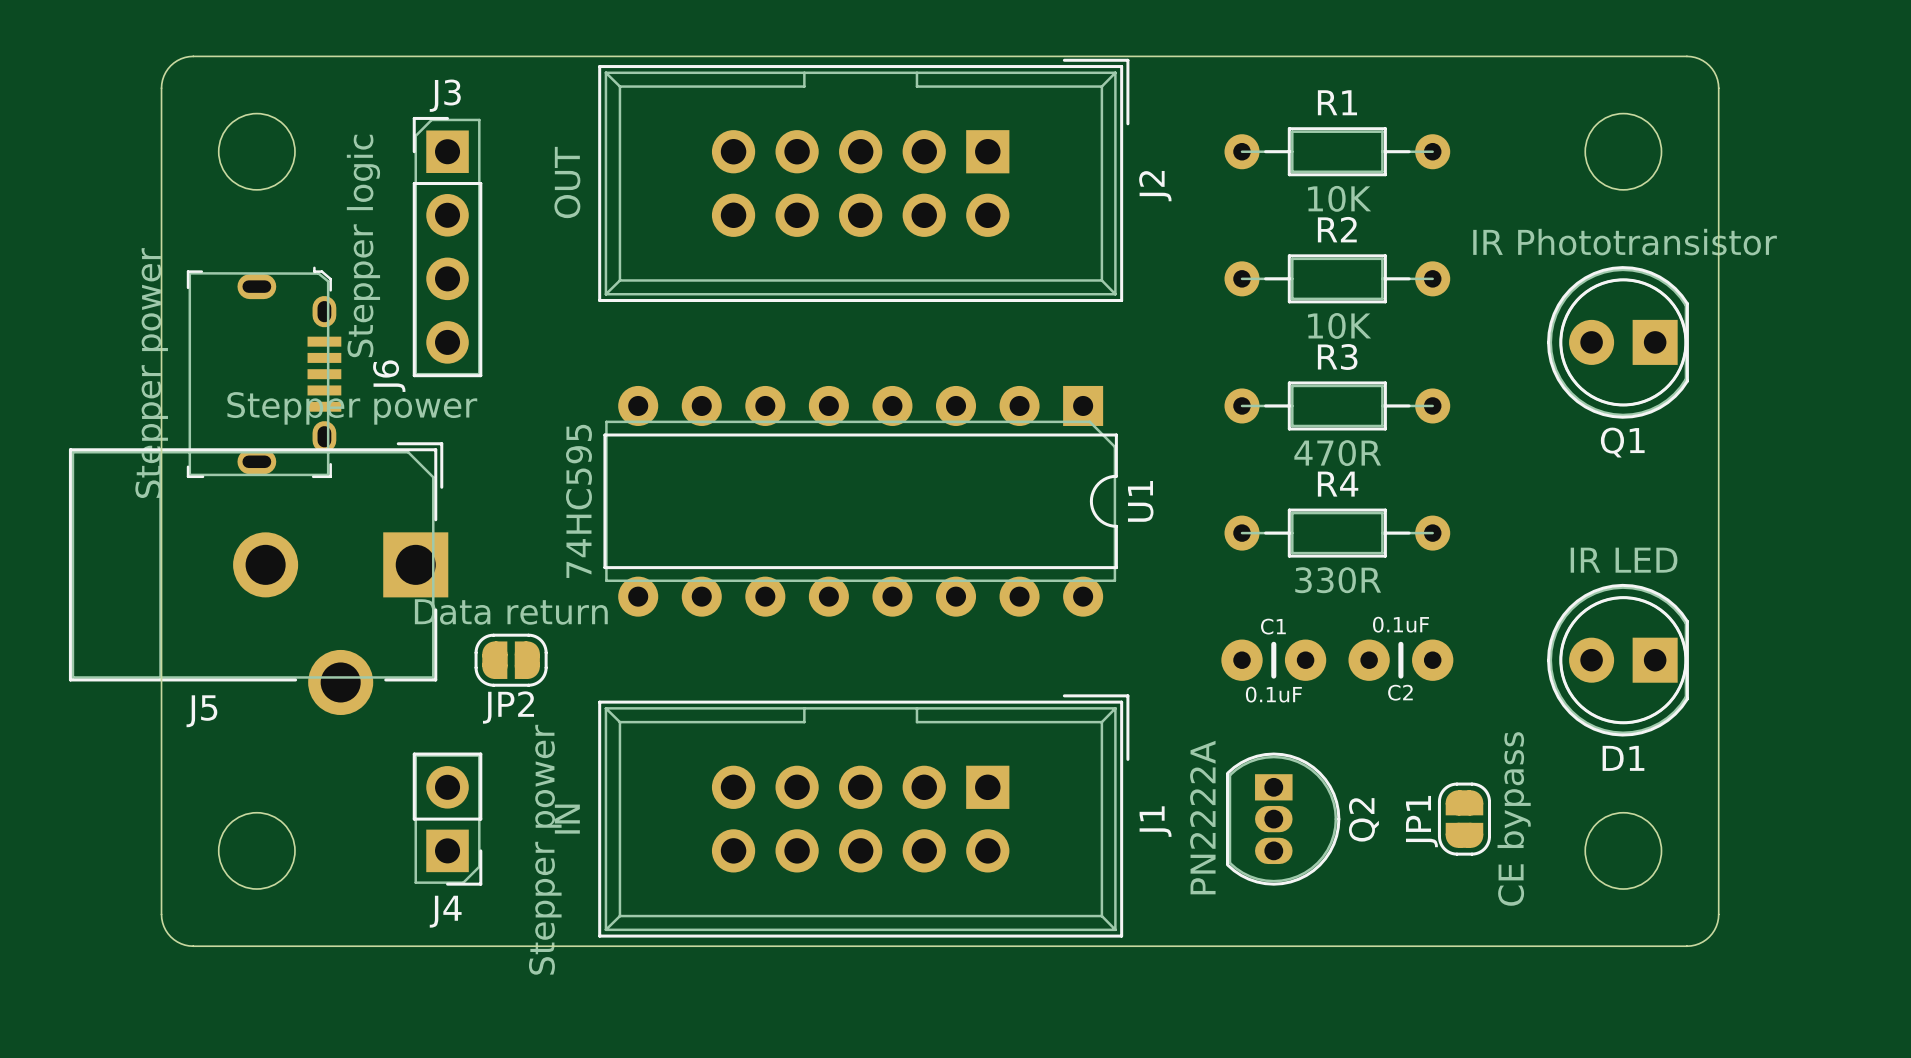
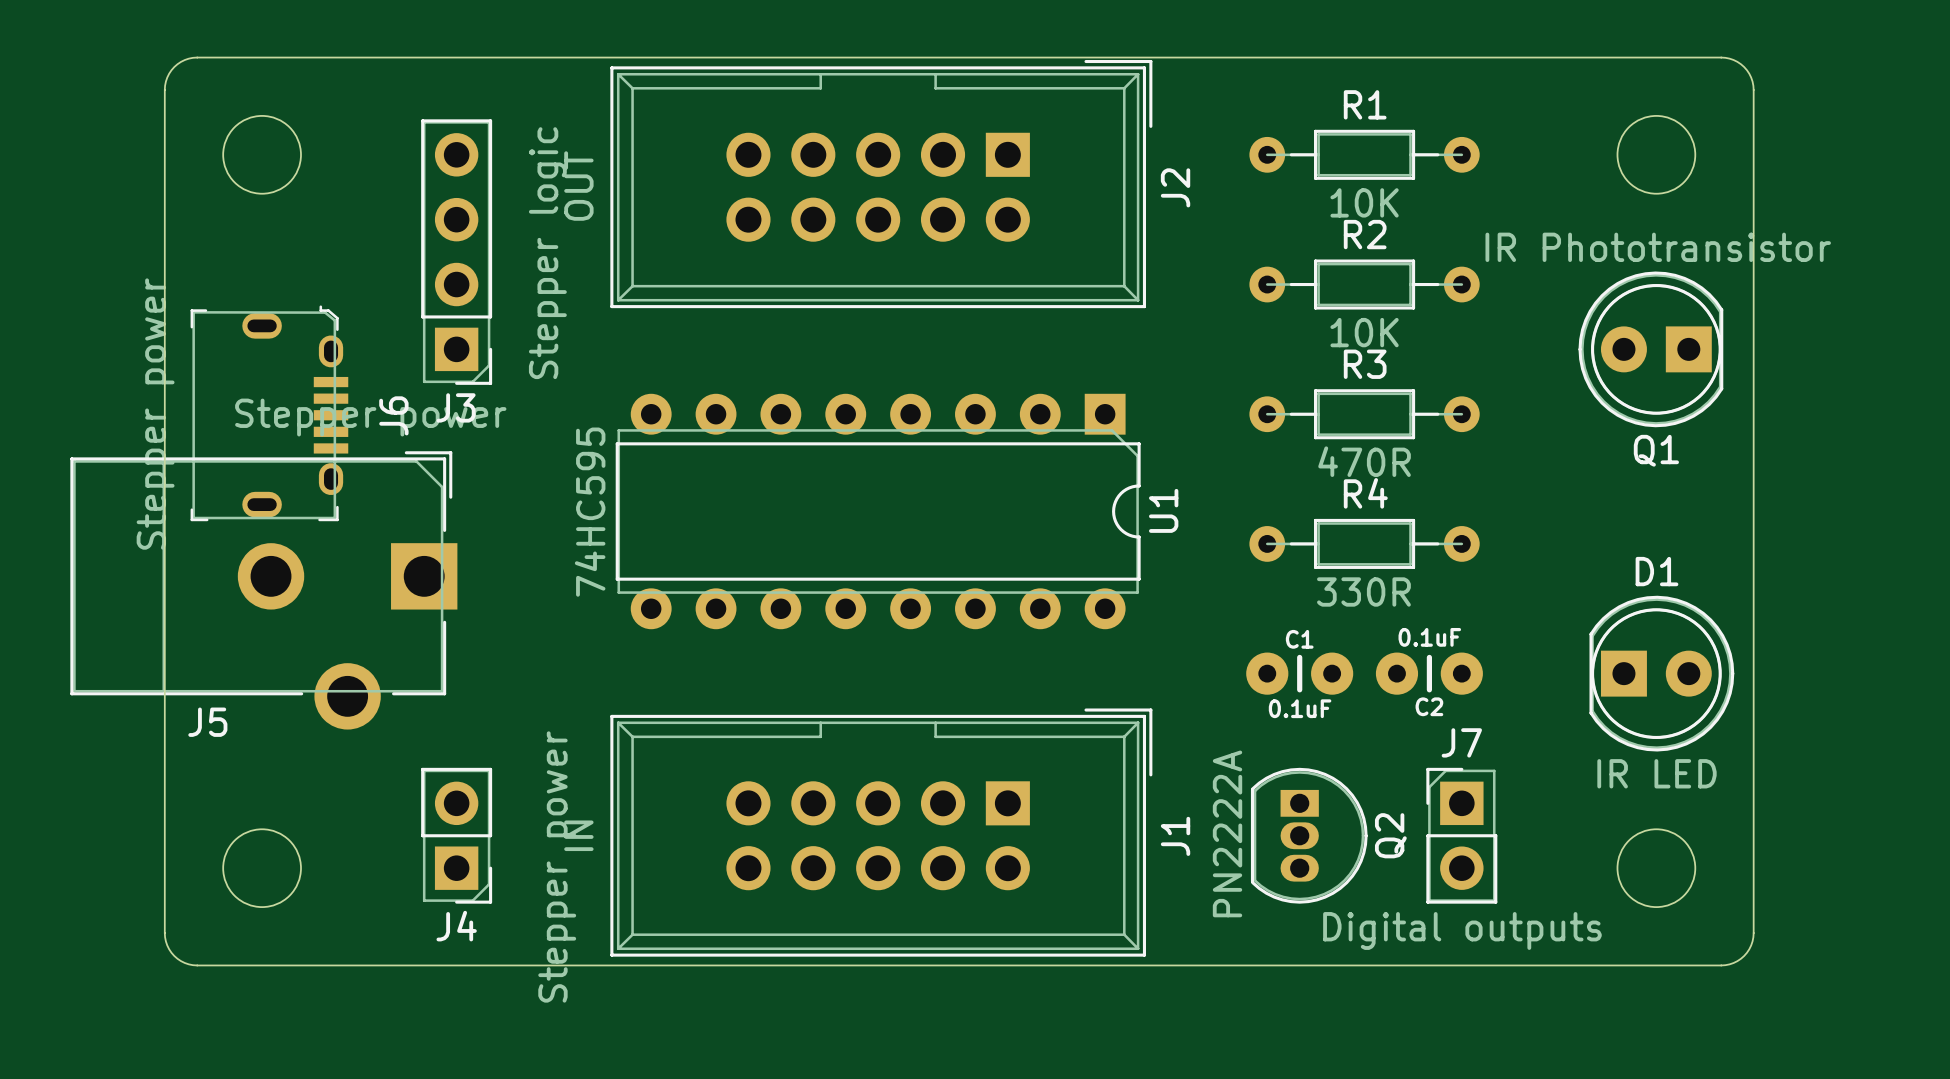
J3 rotation: 0° (447, 247) -> 180° (456, 252)
J6 position: (264, 372) -> (269, 413)
JP2: Data return (511, 660) -> none
D1 rotation: 0° (1617, 660) -> 180° (1661, 673)
J7: none -> Digital outputs (1461, 835)
JP1: CE bypass (1464, 819) -> none

